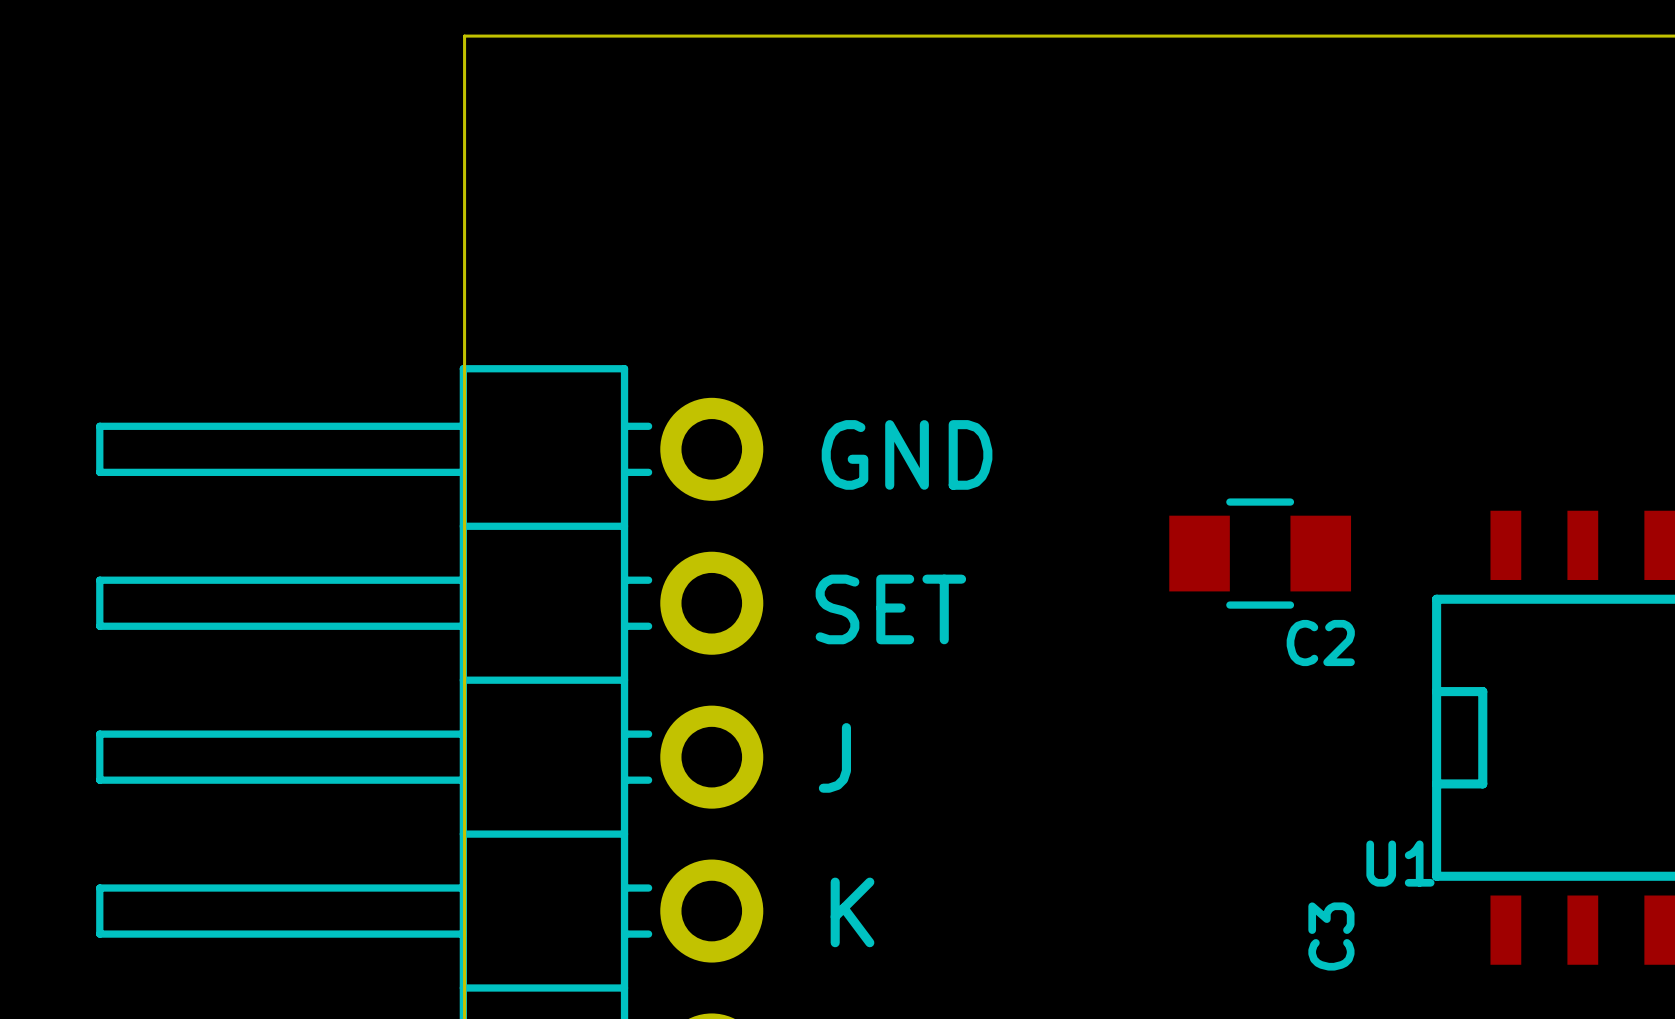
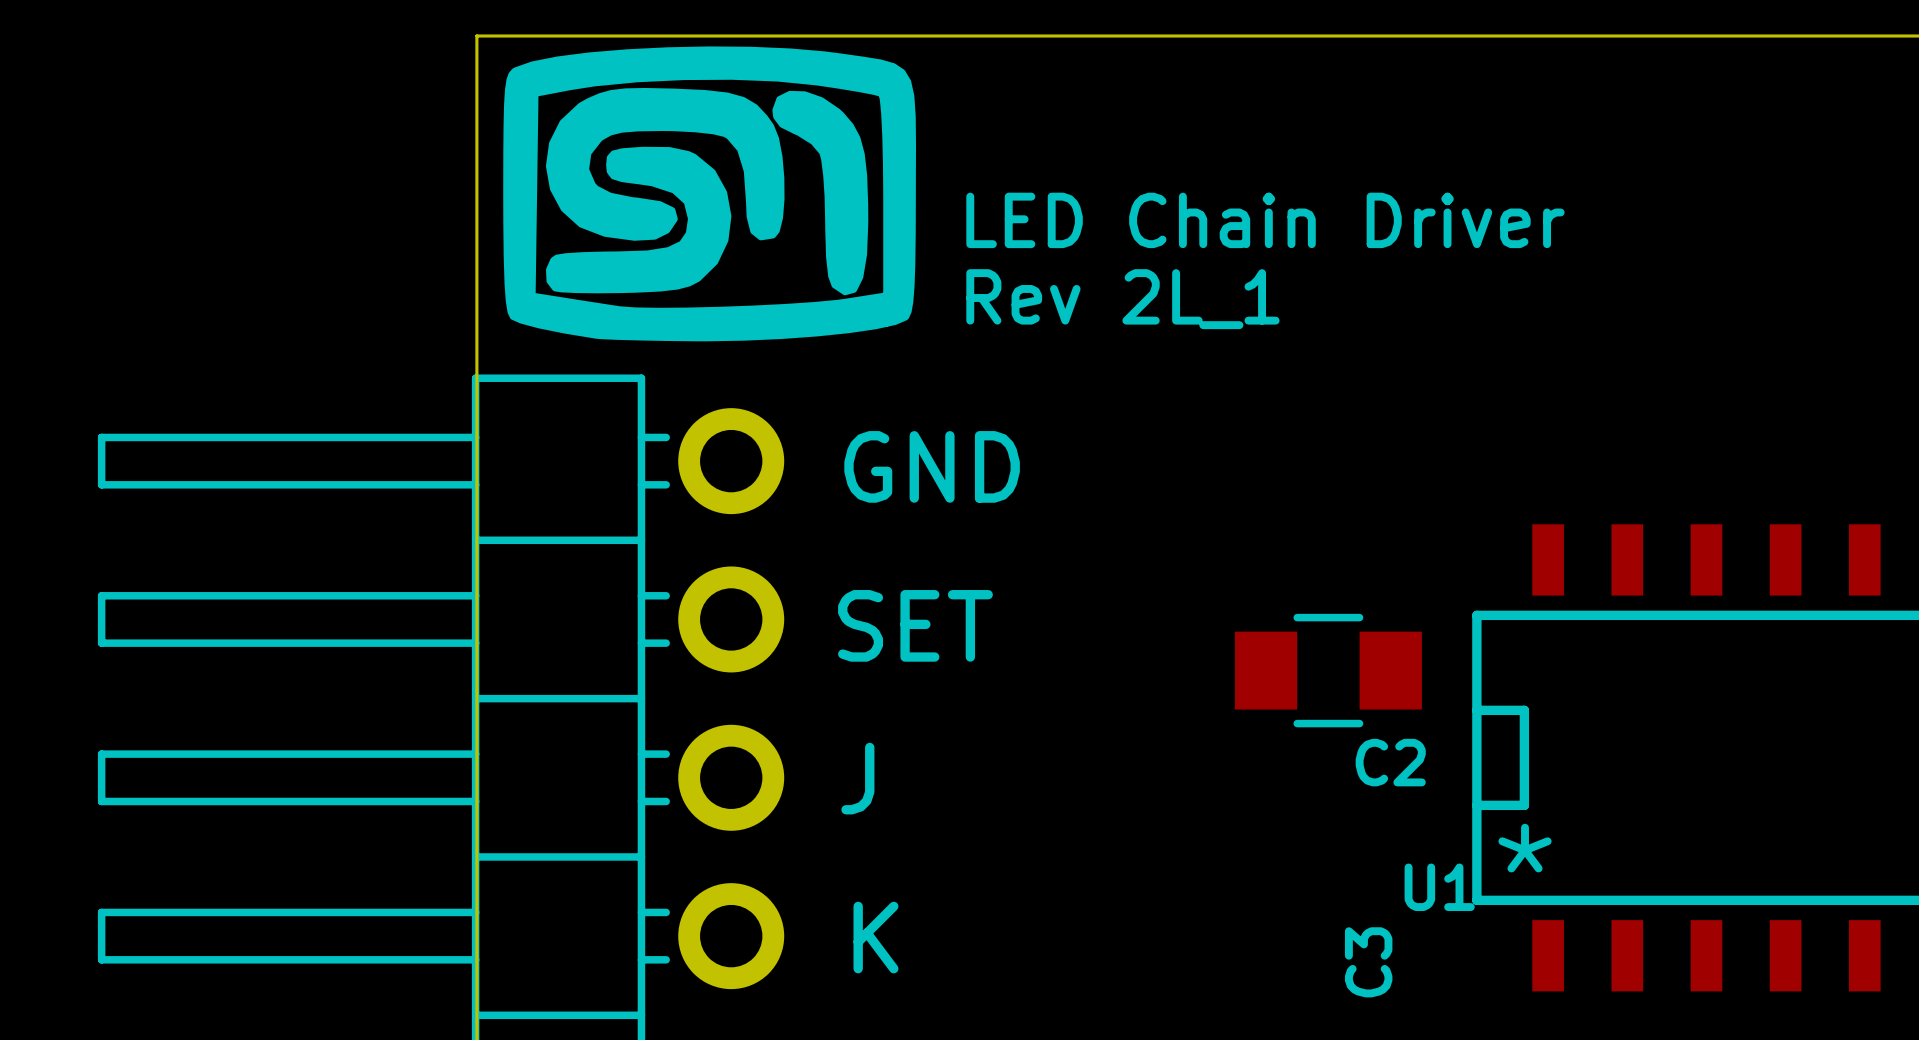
drawing: none -> [503, 46, 917, 342]
text: none -> LED Chain Driver (1265, 220)
text: none -> Rev 2L_1 (1122, 299)
C2 position: (1260, 553) -> (1328, 670)
text: none -> * (1525, 848)

